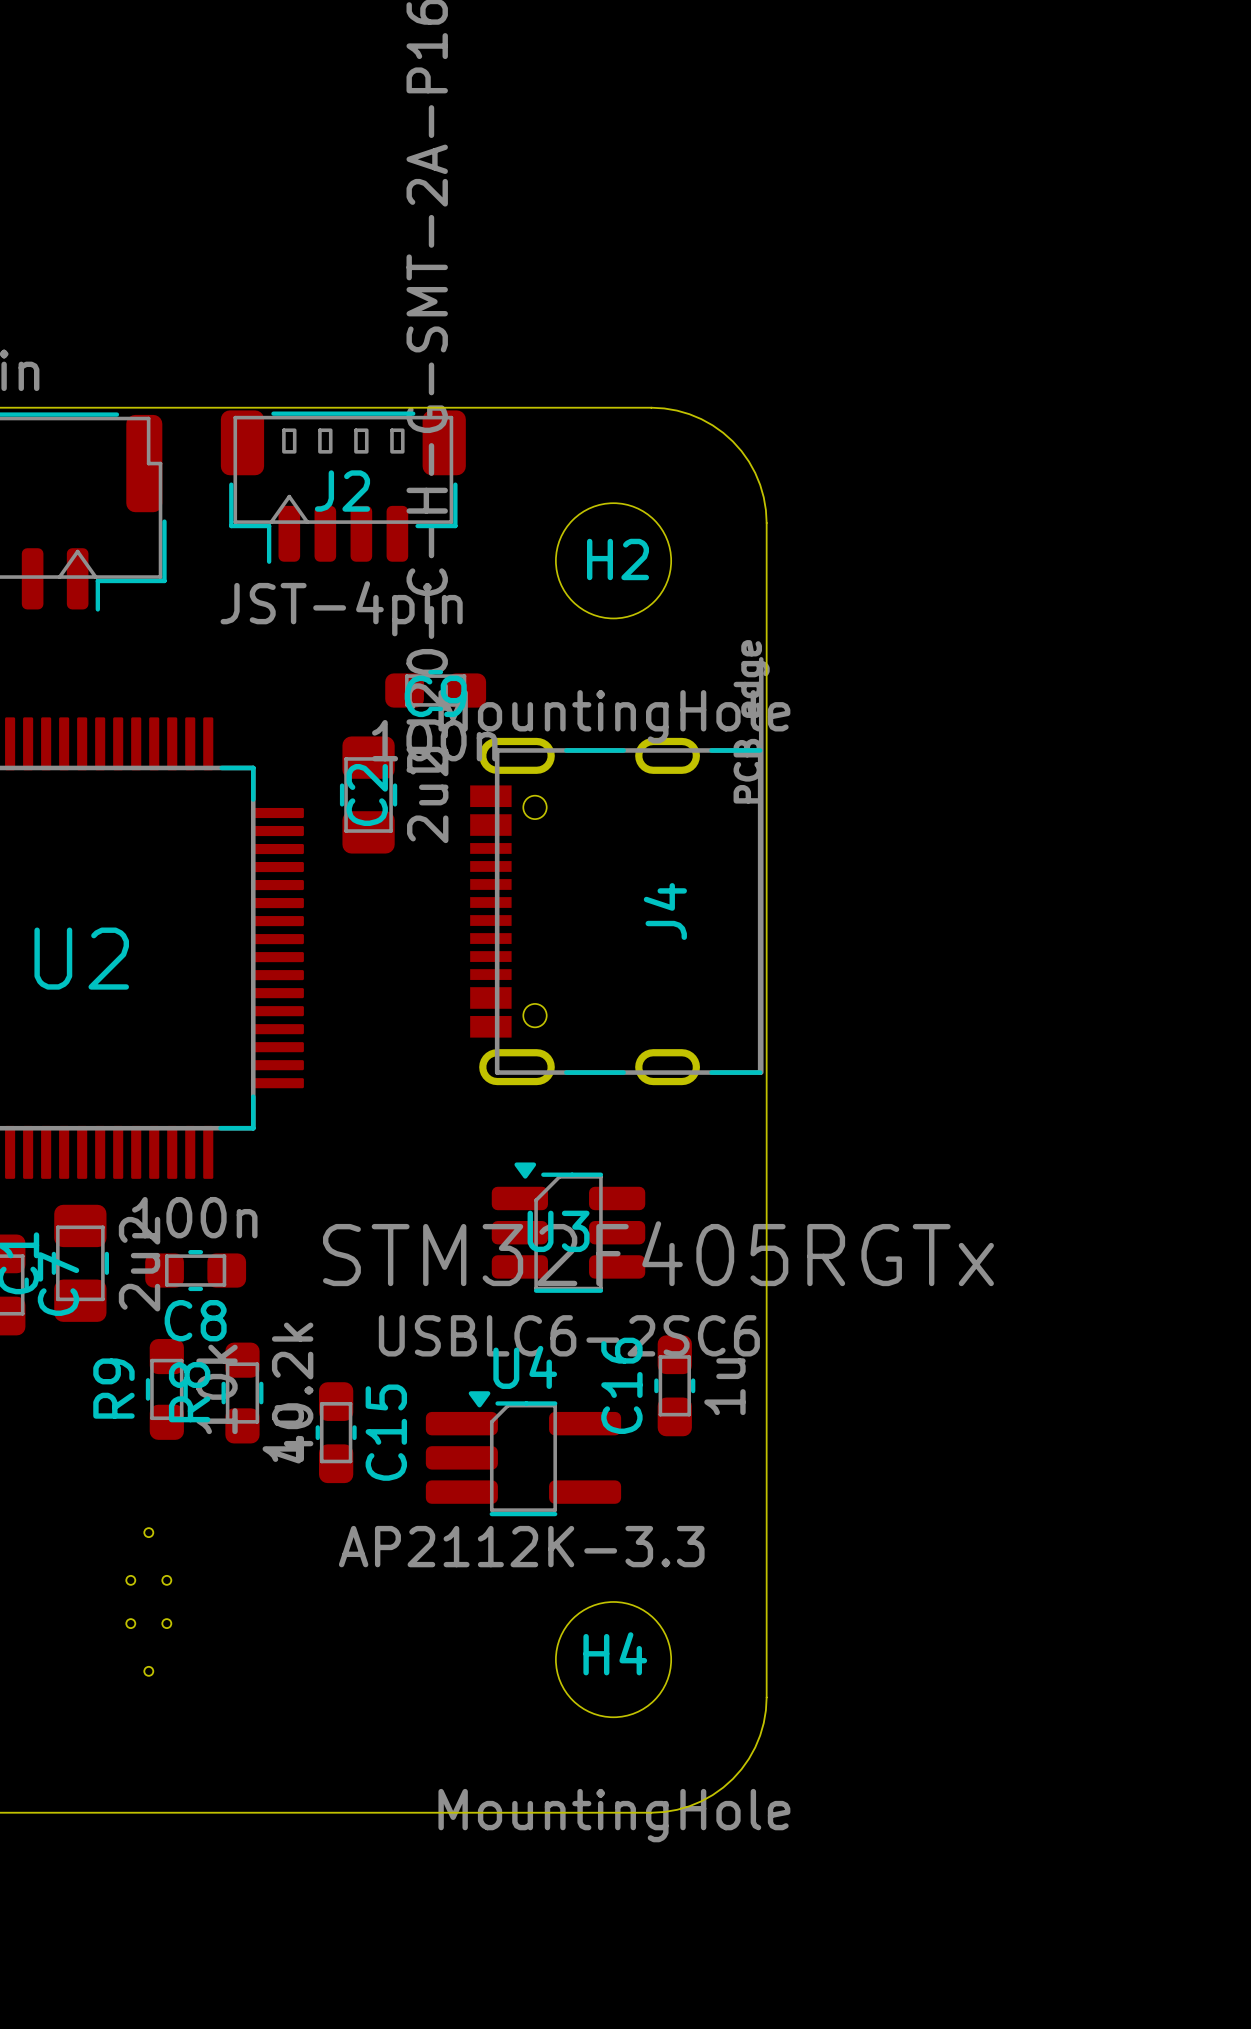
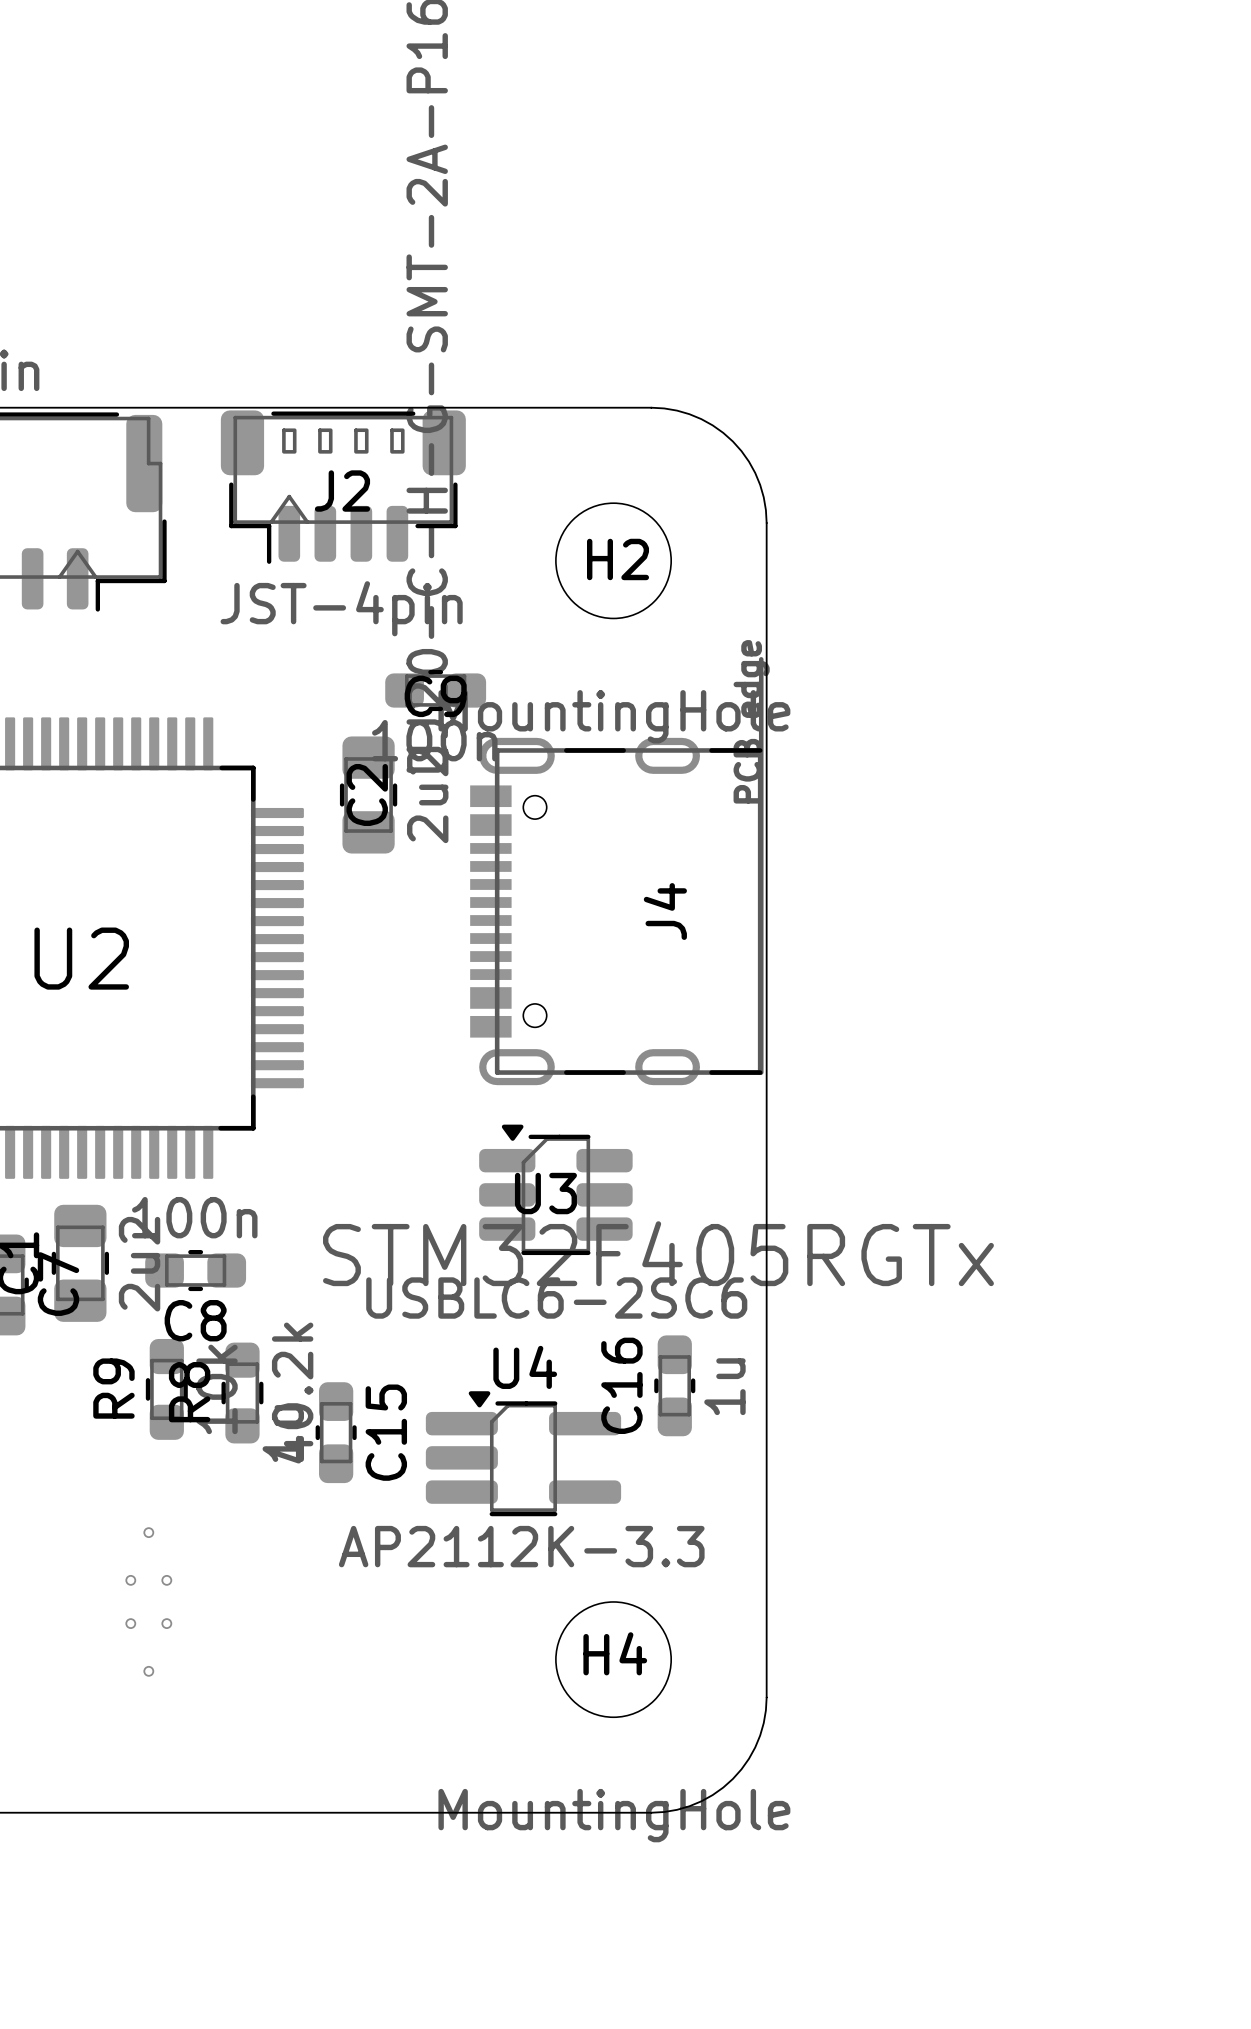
U3 position: (568, 1227) -> (555, 1189)

